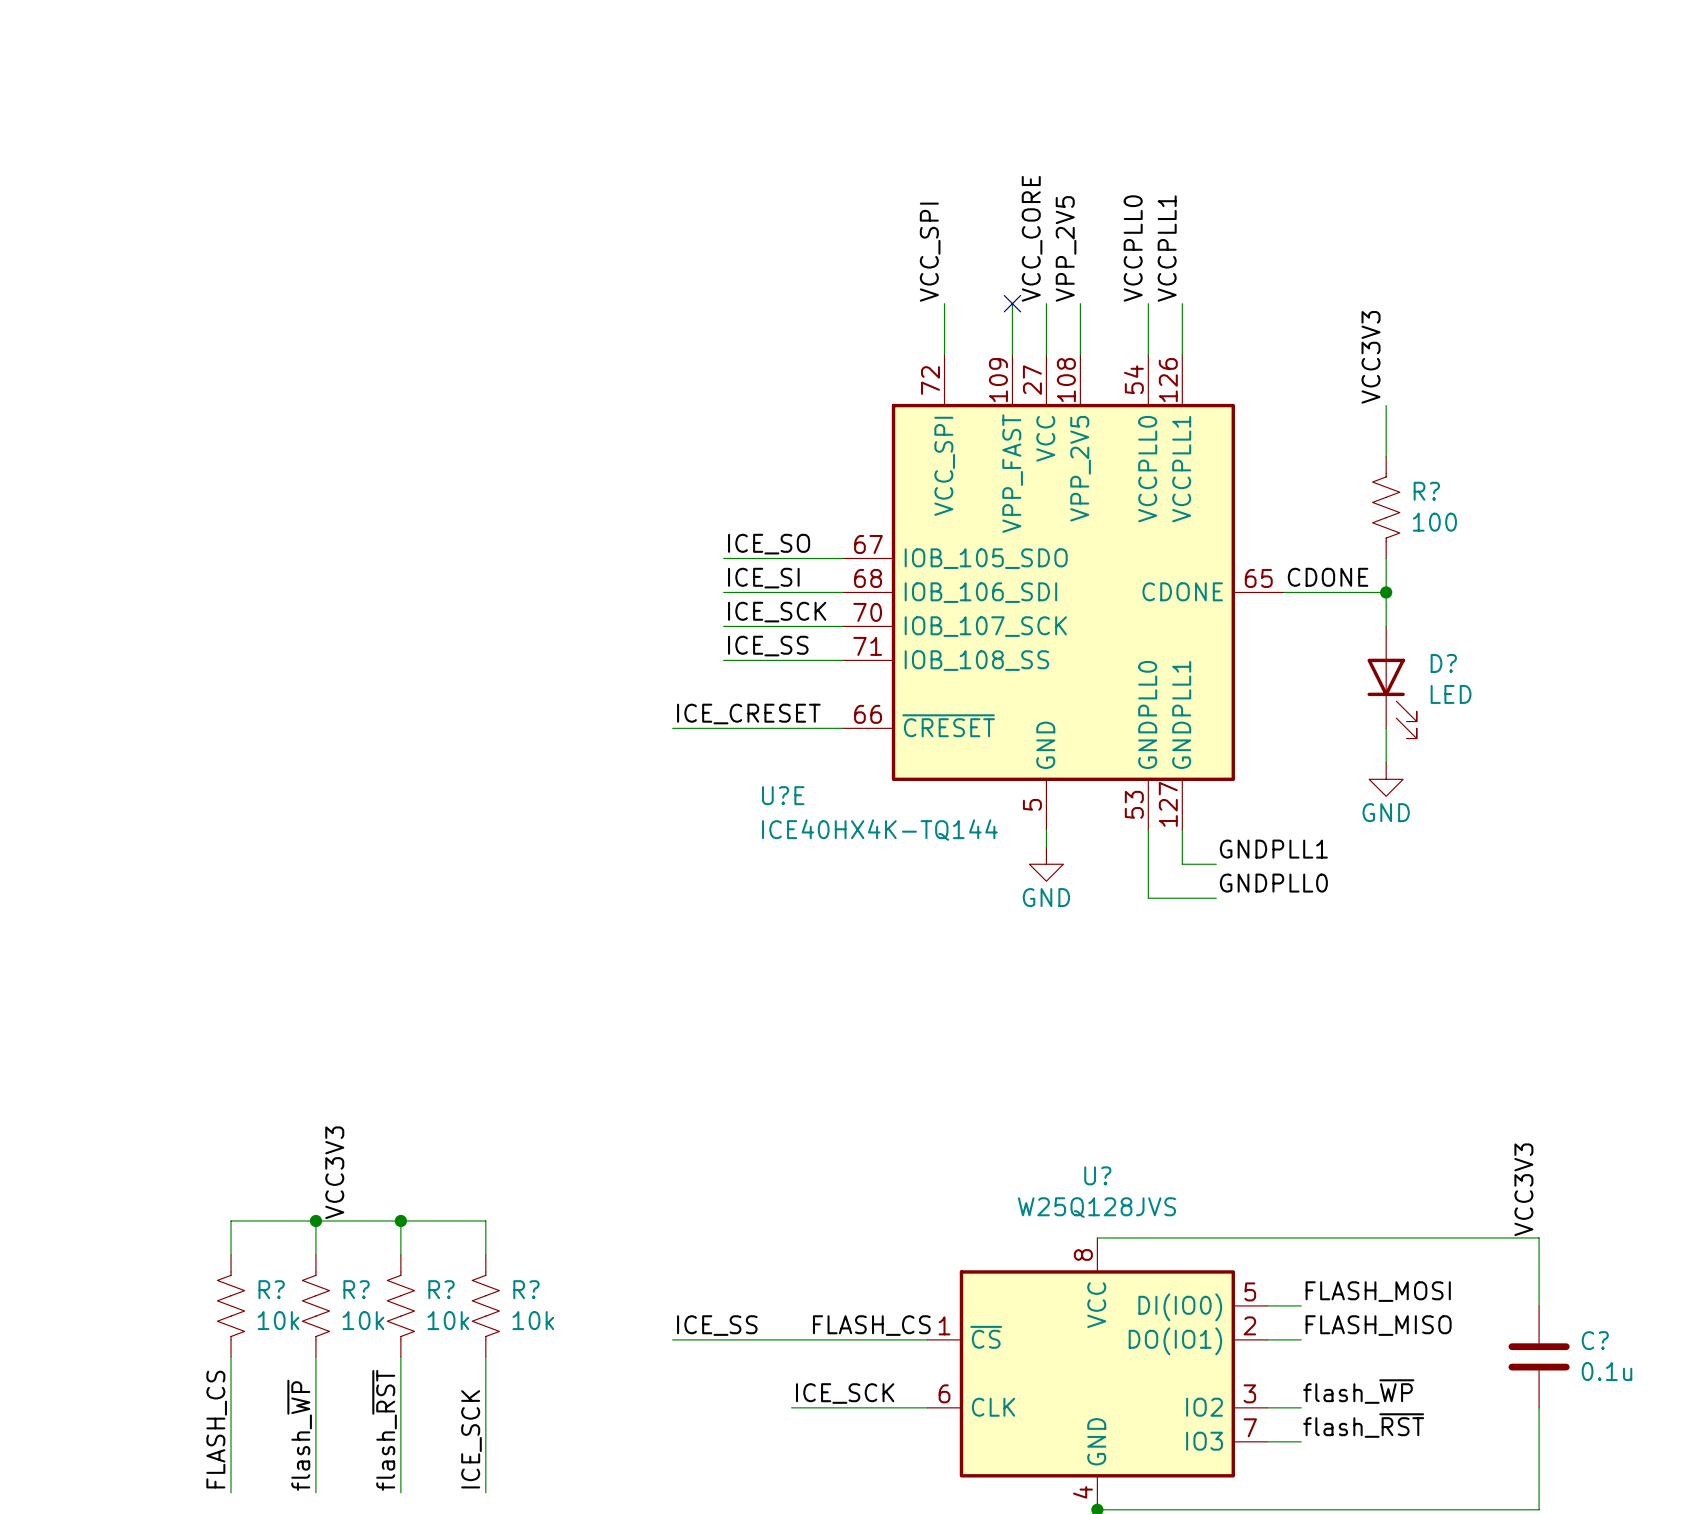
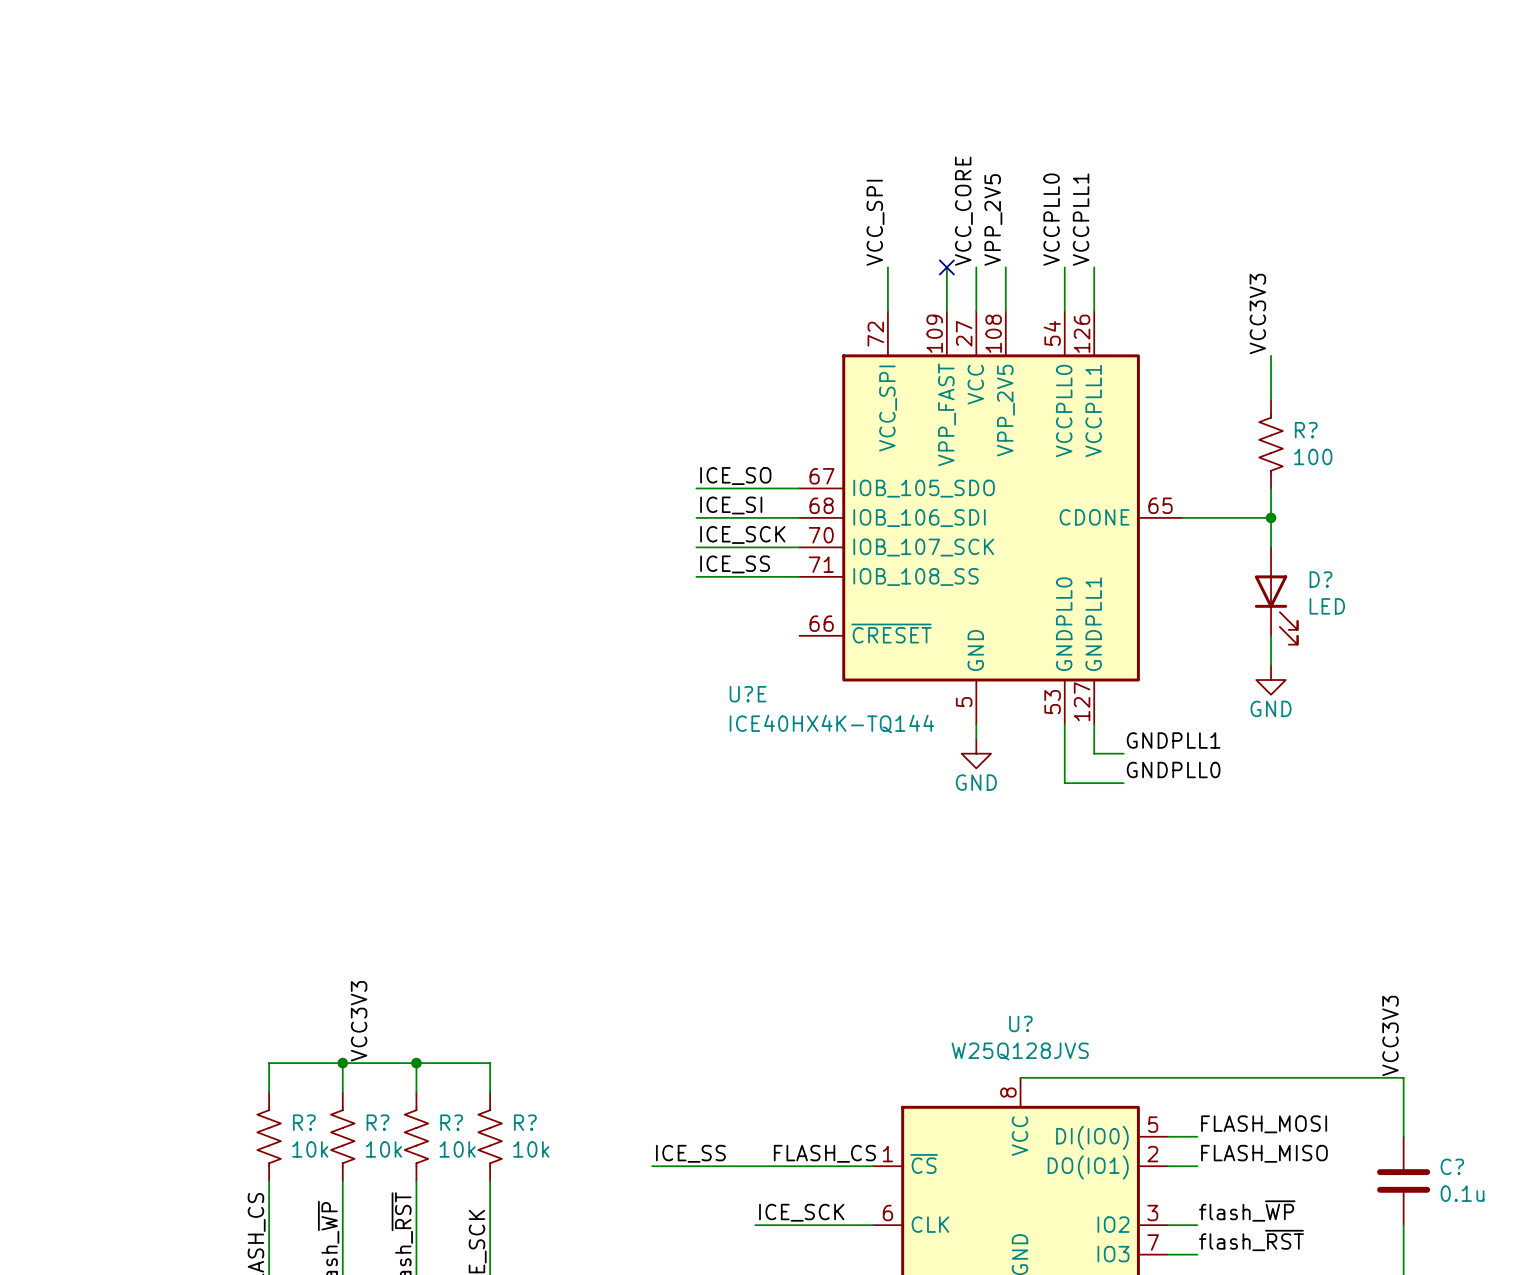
label: CDONE (1328, 577) -> none
label: ICE_CRESET (748, 714) -> none
wire: (672, 728) (842, 728) -> none

